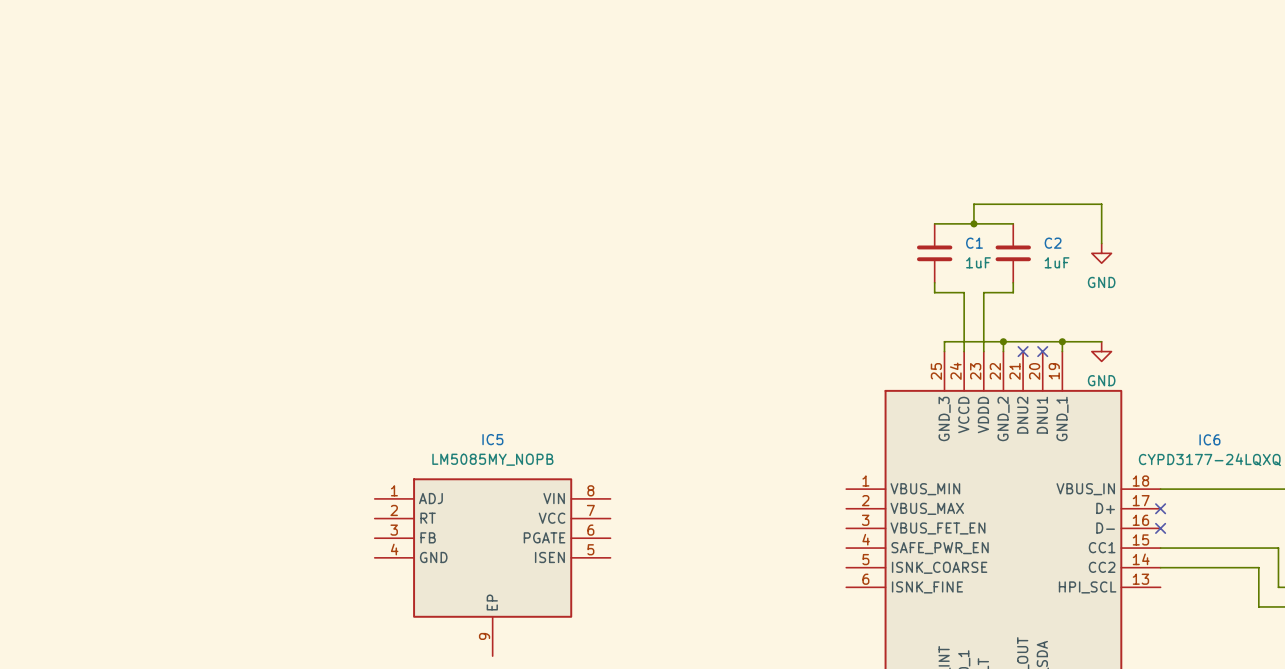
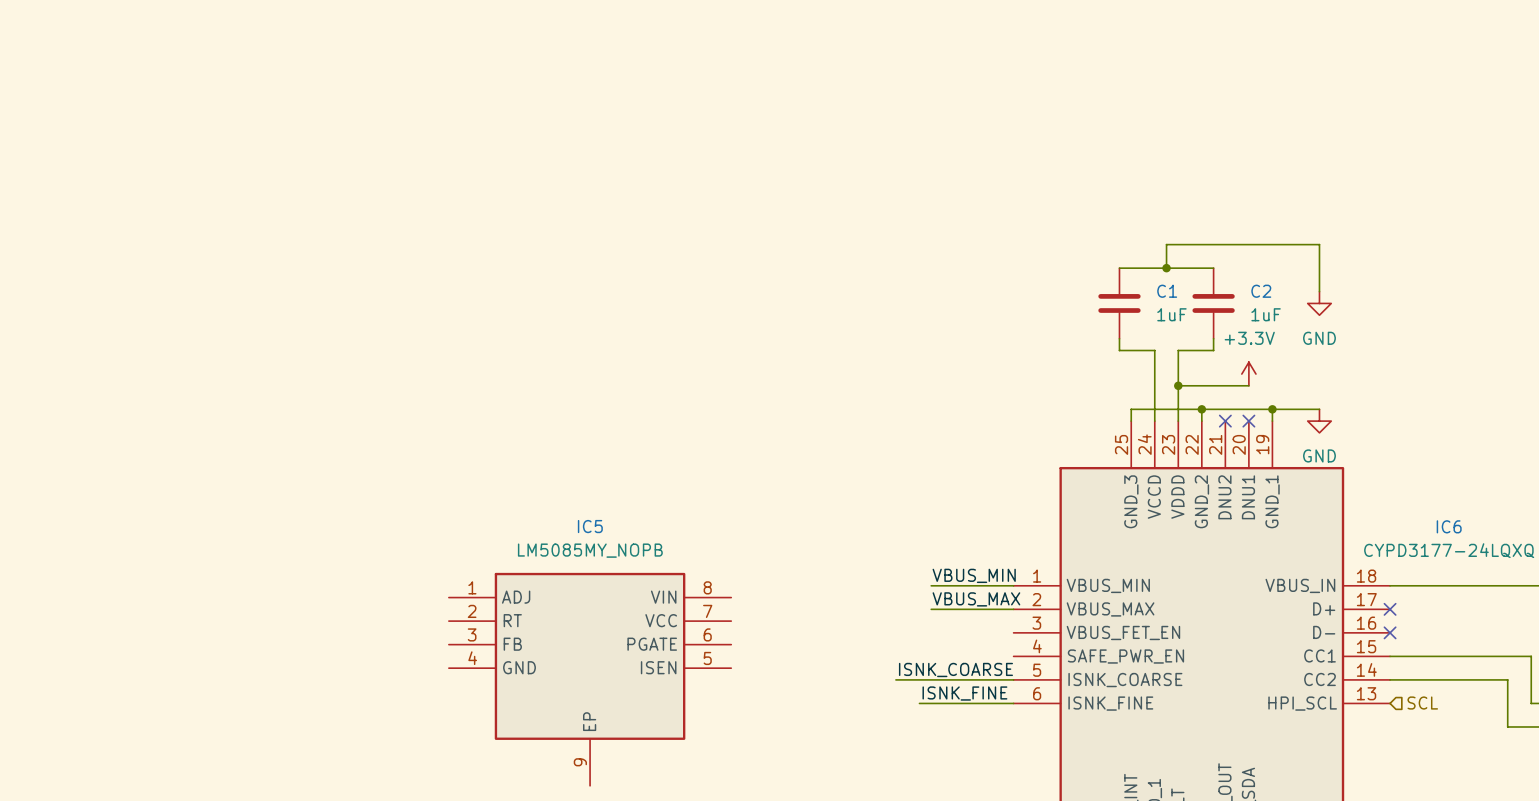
power symbol: none -> +3.3V (1248, 374)
wire: none -> (1178, 385) (1248, 385)
junction: none -> (1178, 385)
label: none -> VBUS_MIN (974, 575)
wire: none -> (931, 585) (1013, 585)
label: none -> VBUS_MAX (976, 599)
wire: none -> (931, 609) (1013, 609)
label: none -> ISNK_COARSE (955, 669)
wire: none -> (895, 679) (1013, 679)
label: none -> ISNK_FINE (964, 693)
hierarchical label: none -> SCL (1422, 703)
wire: none -> (919, 703) (1013, 703)

